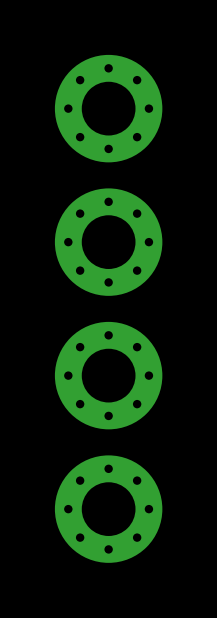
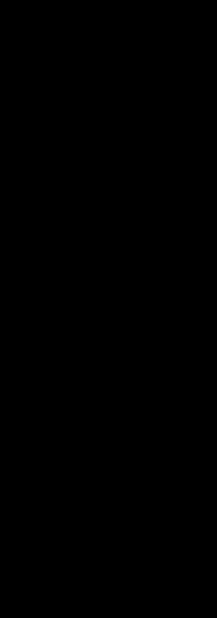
part: (108, 108) -> none
part: (108, 242) -> none
part: (108, 375) -> none
part: (108, 509) -> none

